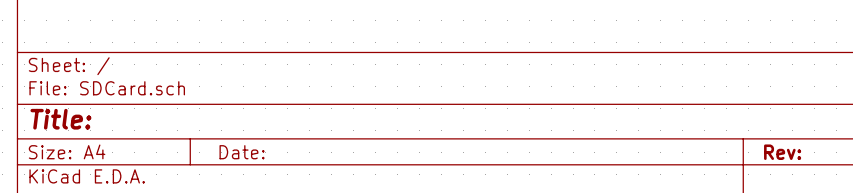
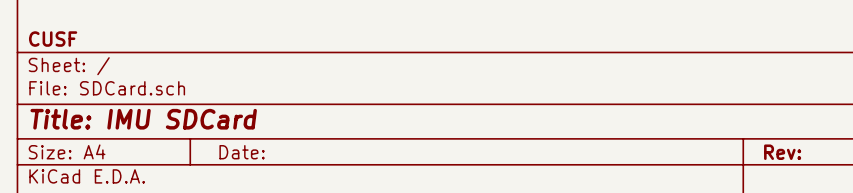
title block: none -> CUSF (53, 39)
title block: Title: (60, 119) -> Title: IMU SDCard (143, 119)

